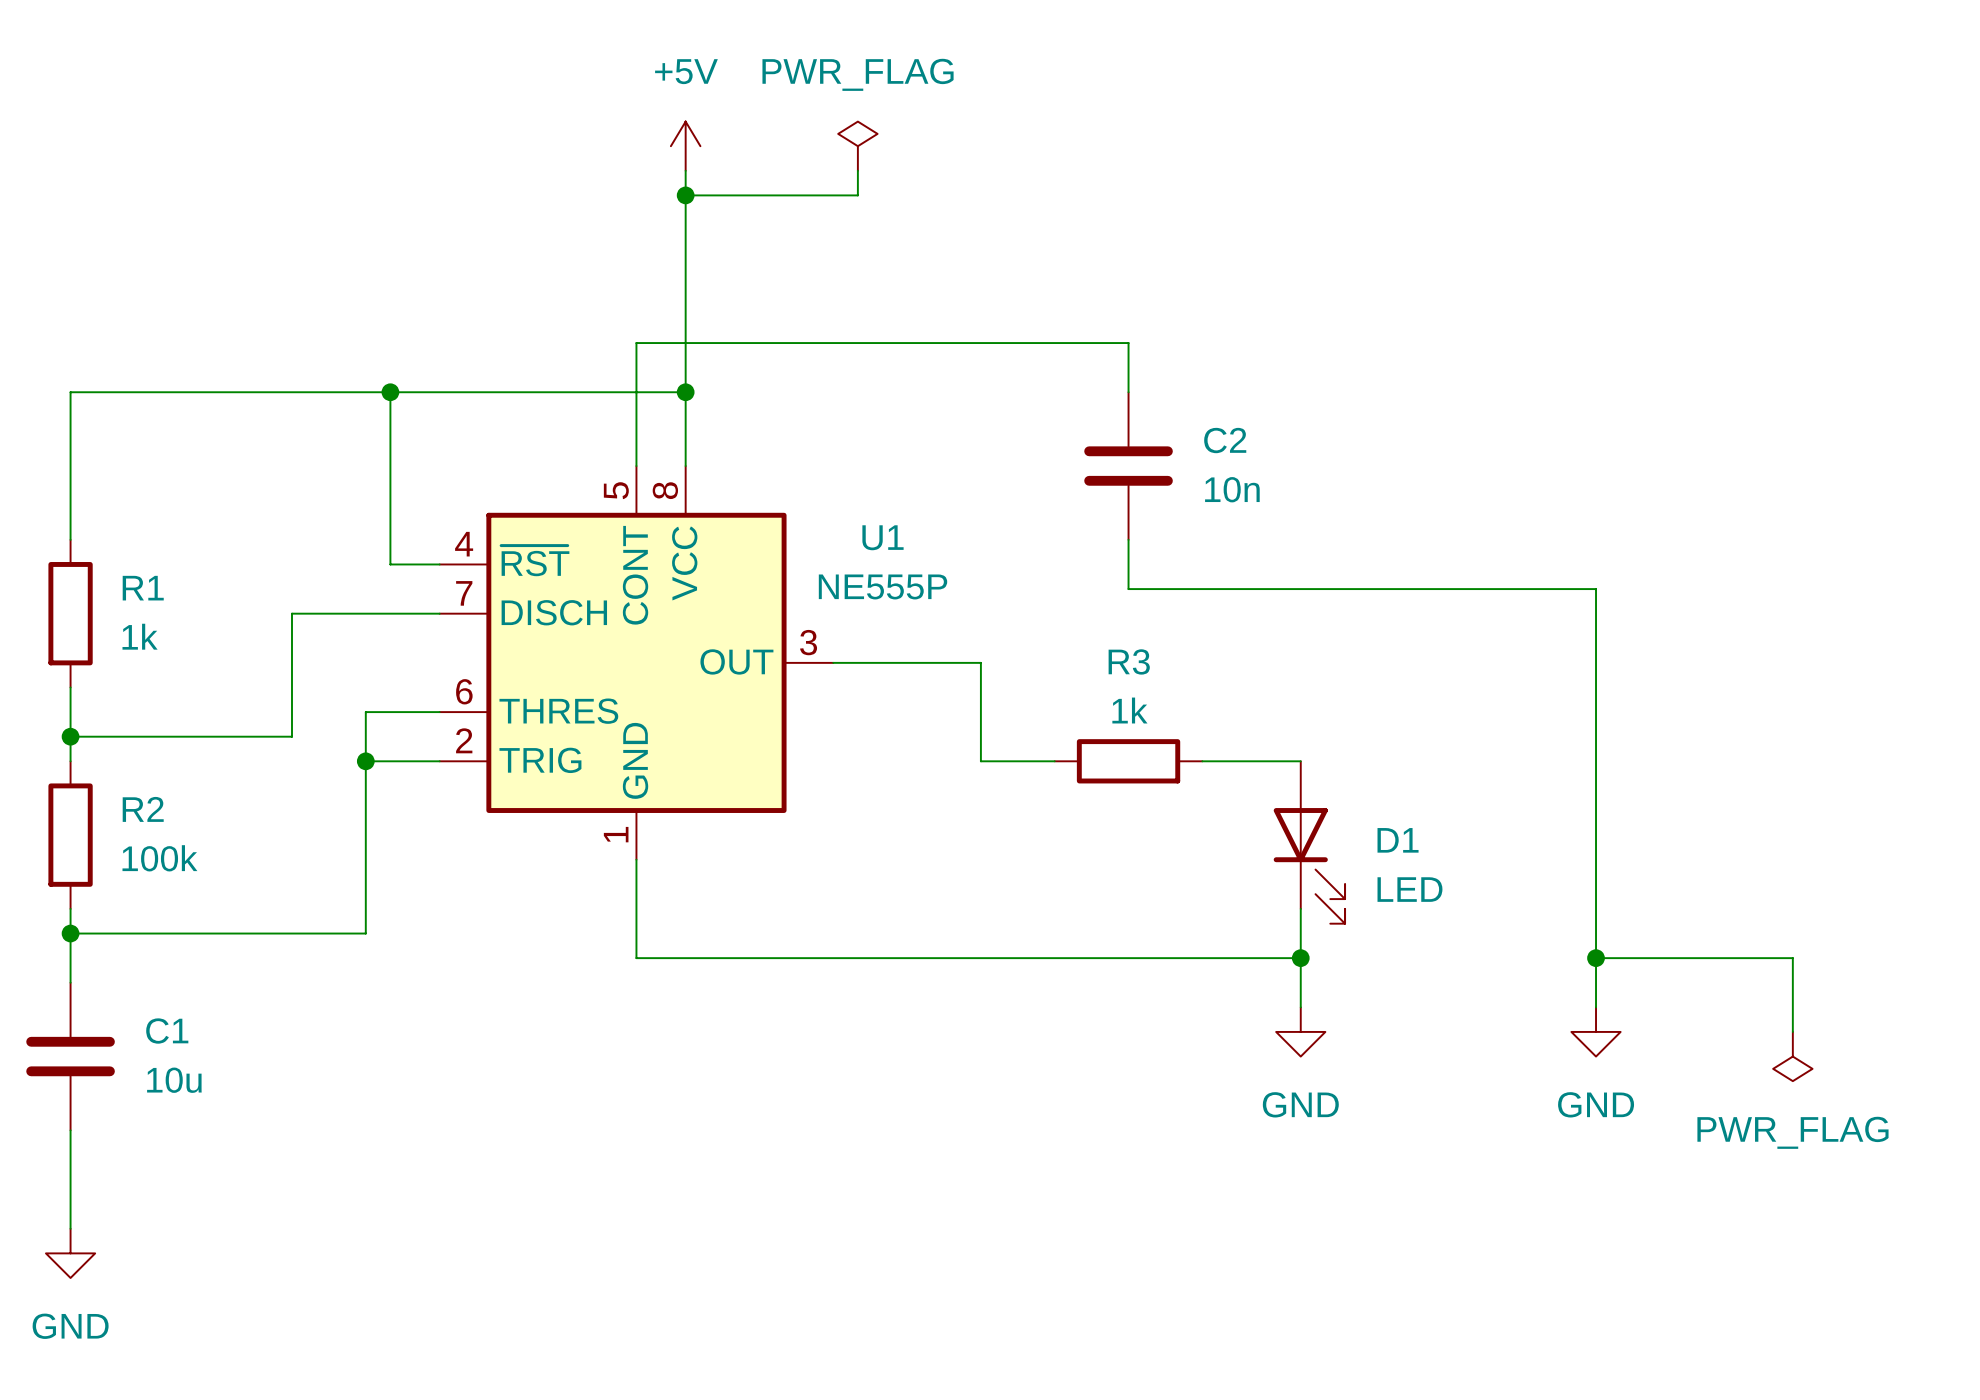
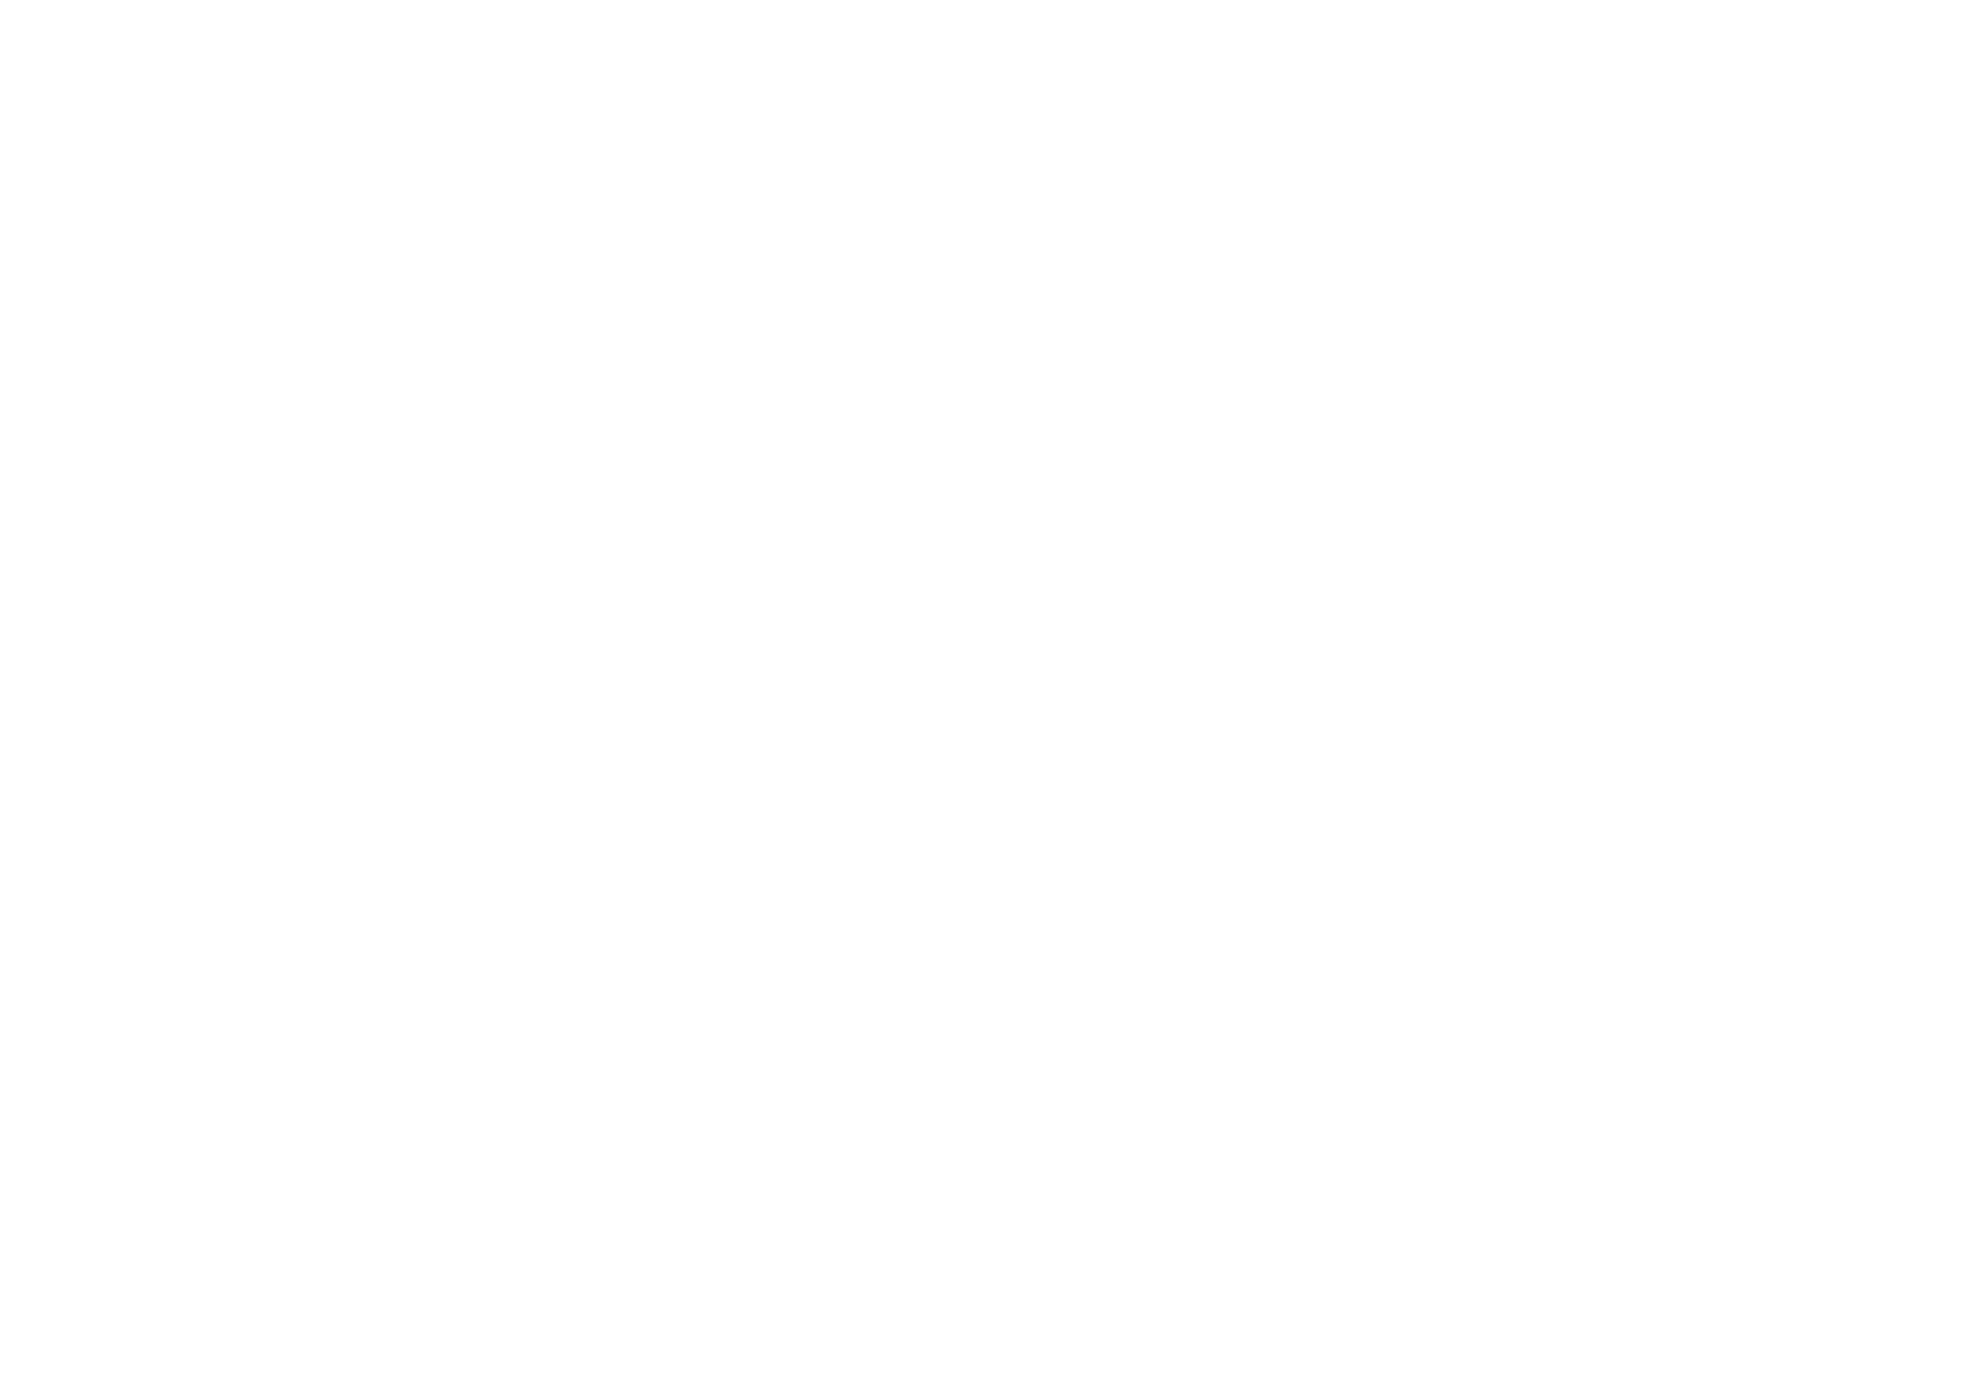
power symbol: +5V (685, 146) -> none
power symbol: PWR_FLAG (857, 146) -> none
wire: (685, 170) (685, 466) -> none
wire: (857, 170) (857, 195) (685, 195) -> none
junction: (685, 195) -> none
wire: (390, 392) (390, 564) (439, 564) -> none
junction: (390, 392) -> none
wire: (685, 392) (70, 392) (70, 539) -> none
junction: (685, 392) -> none
wire: (1128, 392) (1128, 343) (636, 343) (636, 466) -> none
C2: 10n (1128, 466) -> none
wire: (1128, 539) (1128, 589) (1596, 589) (1596, 1007) -> none
R1: 1k (70, 613) -> none
wire: (439, 613) (291, 613) (291, 736) (70, 736) -> none
U1: NE555P (636, 662) -> none
wire: (833, 662) (980, 662) (980, 761) (1054, 761) -> none
wire: (70, 687) (70, 761) -> none
wire: (439, 712) (365, 712) (365, 933) (70, 933) -> none
junction: (70, 736) -> none
wire: (365, 761) (439, 761) -> none
junction: (365, 761) -> none
R3: 1k (1128, 761) -> none
wire: (1202, 761) (1300, 761) -> none
R2: 100k (70, 835) -> none
D1: LED (1309, 842) -> none
wire: (636, 859) (636, 958) (1300, 958) -> none
wire: (70, 908) (70, 982) -> none
wire: (1300, 908) (1300, 1007) -> none
junction: (70, 933) -> none
junction: (1300, 958) -> none
wire: (1596, 958) (1792, 958) (1792, 1031) -> none
junction: (1596, 958) -> none
power symbol: GND (1300, 1031) -> none
power symbol: GND (1596, 1031) -> none
C1: 10u (70, 1056) -> none
power symbol: PWR_FLAG (1792, 1056) -> none
wire: (70, 1130) (70, 1228) -> none
power symbol: GND (70, 1253) -> none

